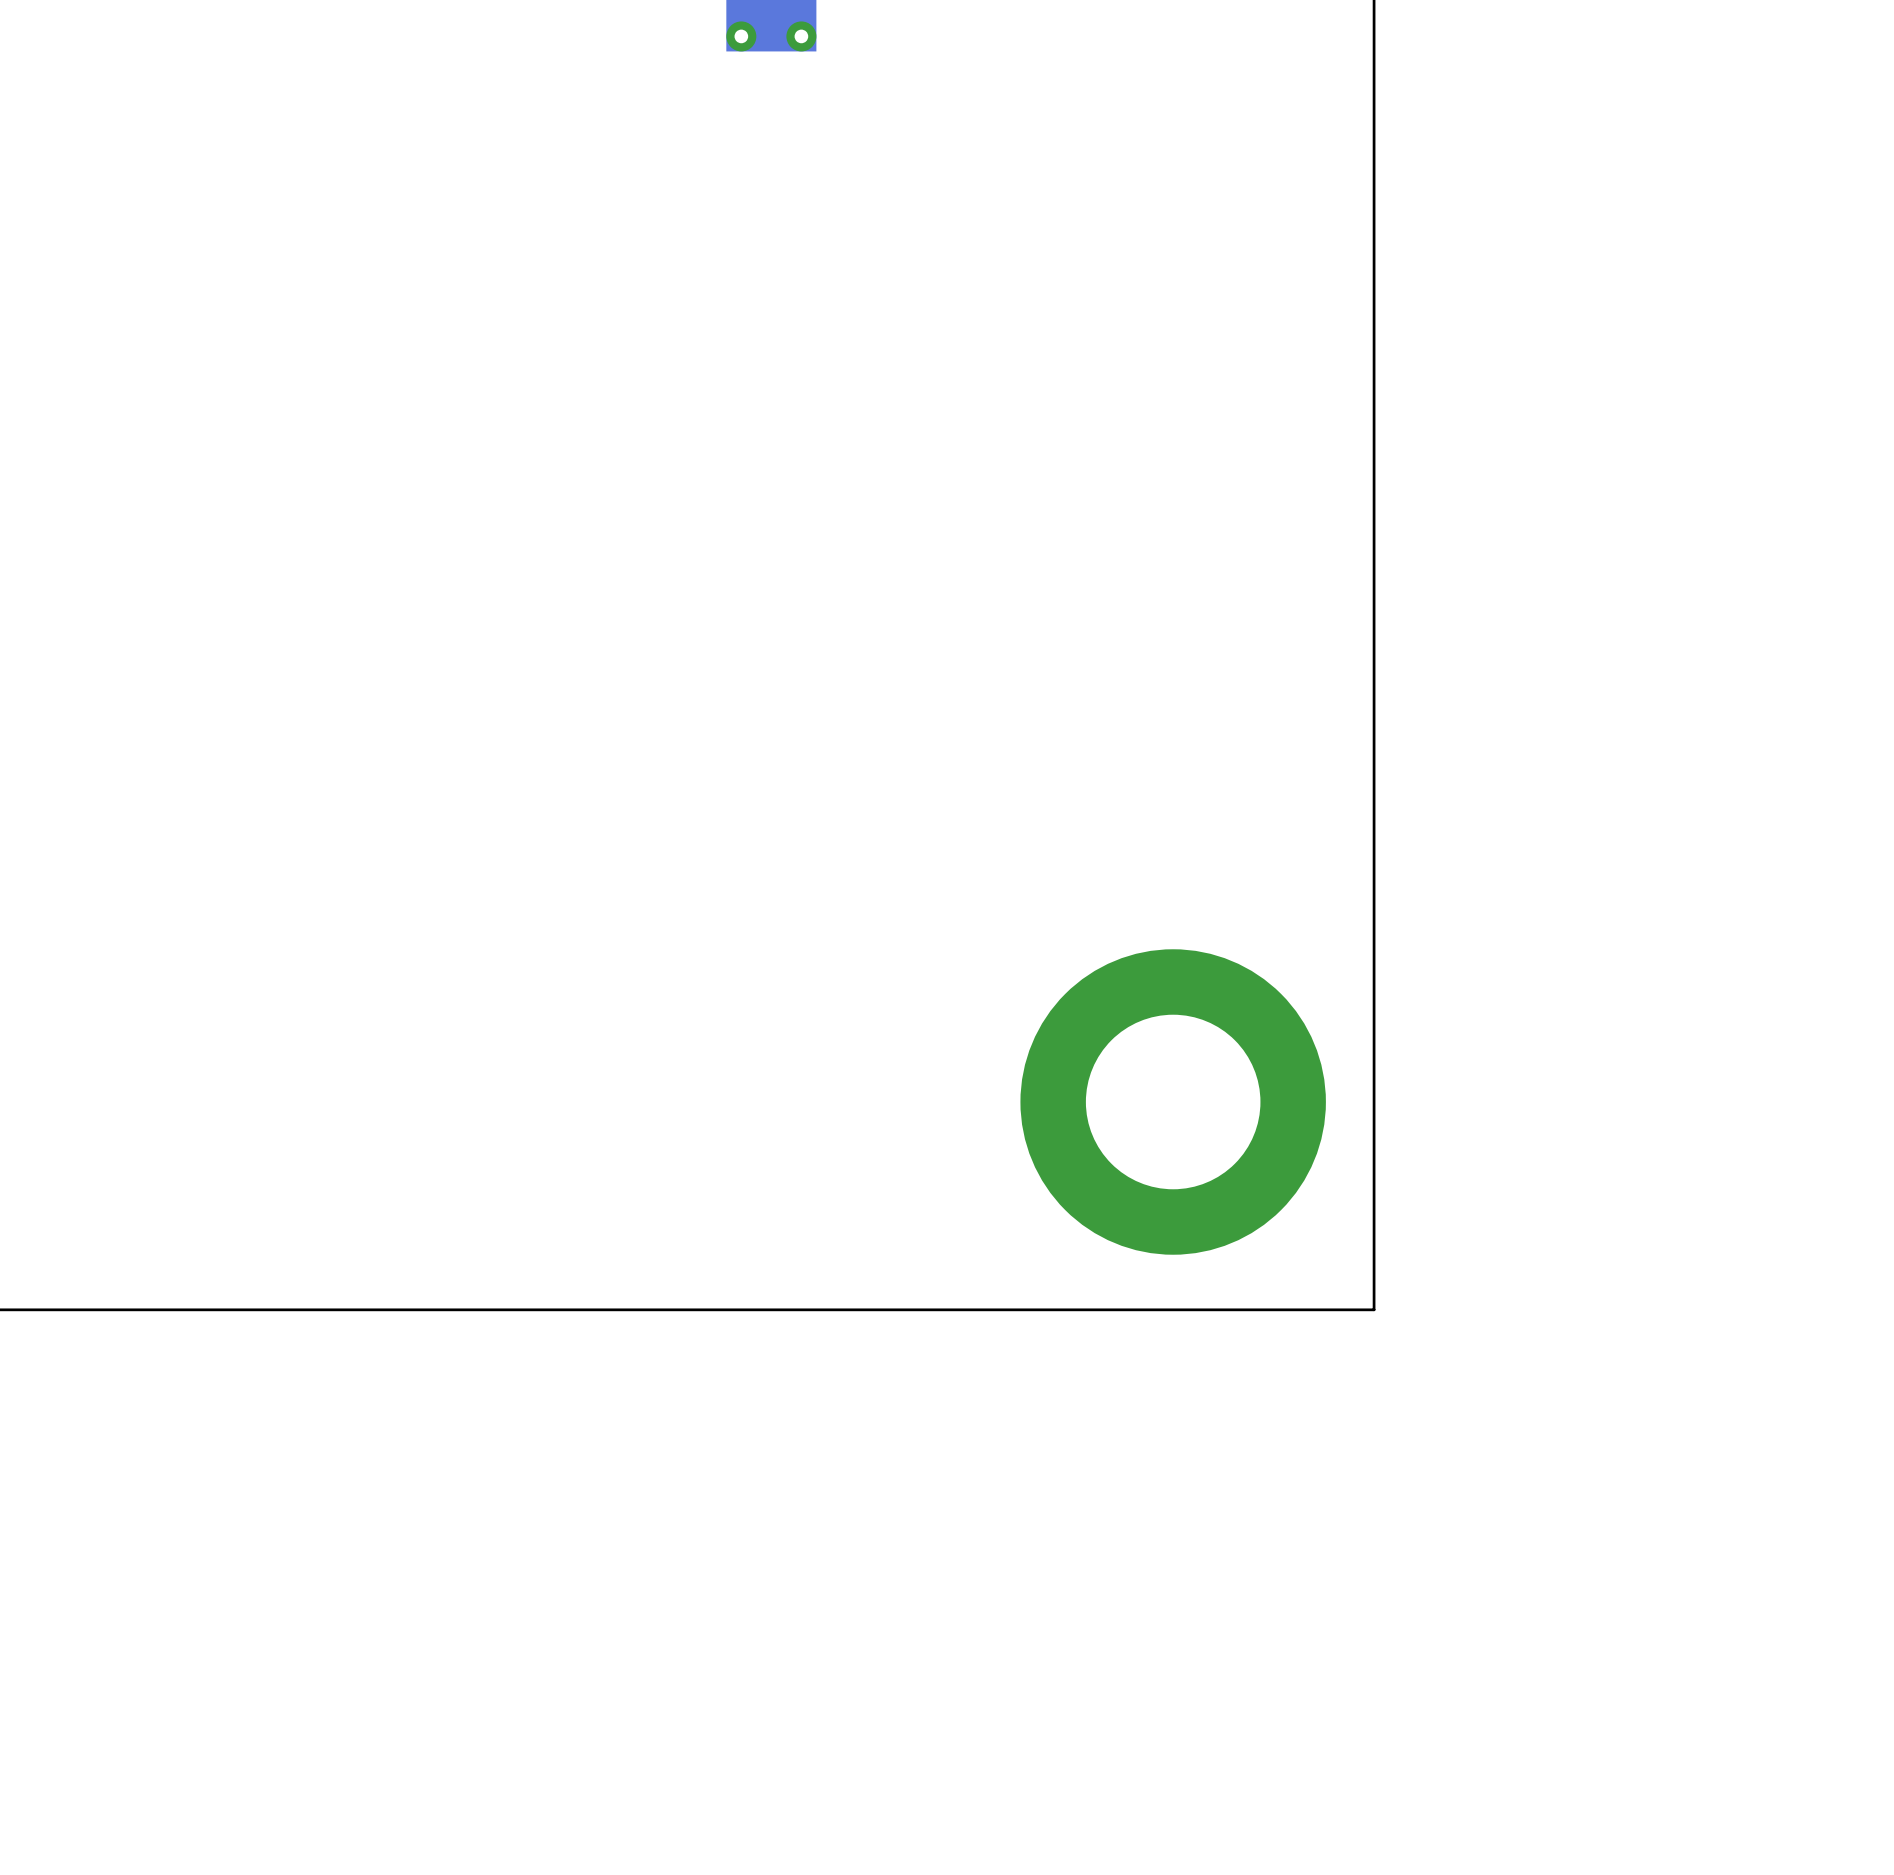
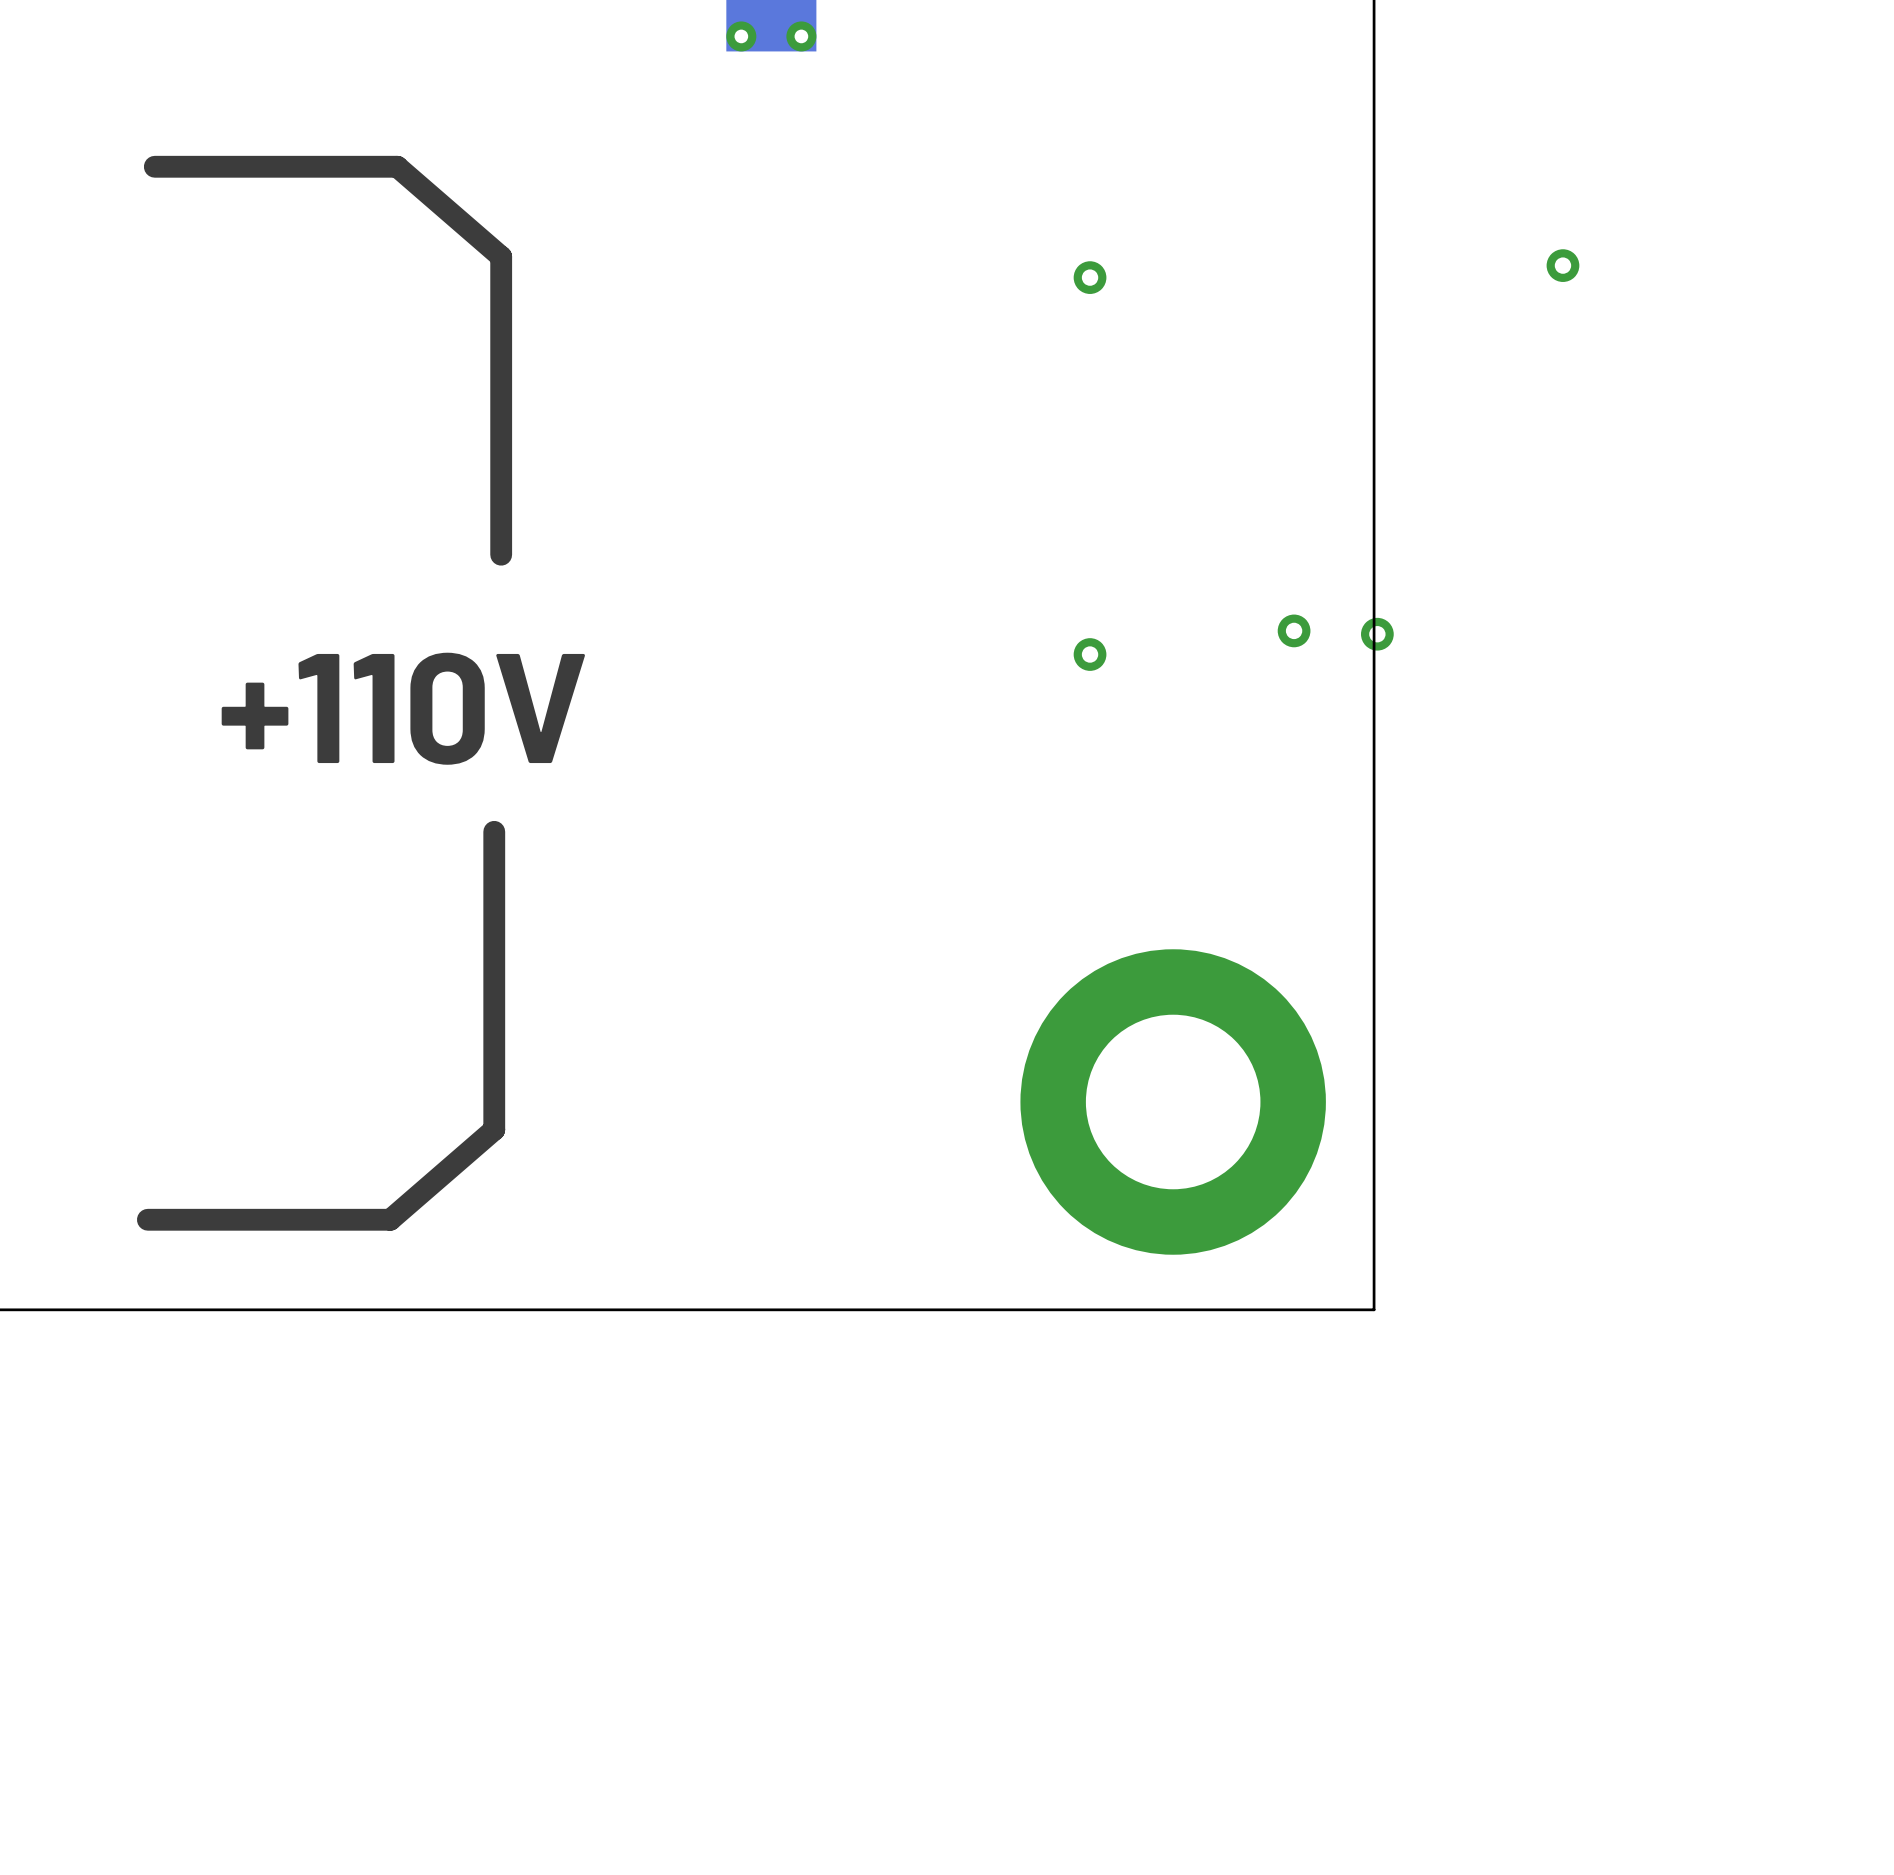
line: none -> (154, 166) (397, 166) (501, 256) (501, 554)
via: none -> (1562, 265)
via: none -> (1090, 277)
via: none -> (1294, 630)
via: none -> (1377, 634)
via: none -> (1090, 654)
text: none -> +110V (403, 708)
line: none -> (494, 831) (494, 1129) (390, 1219) (147, 1219)

